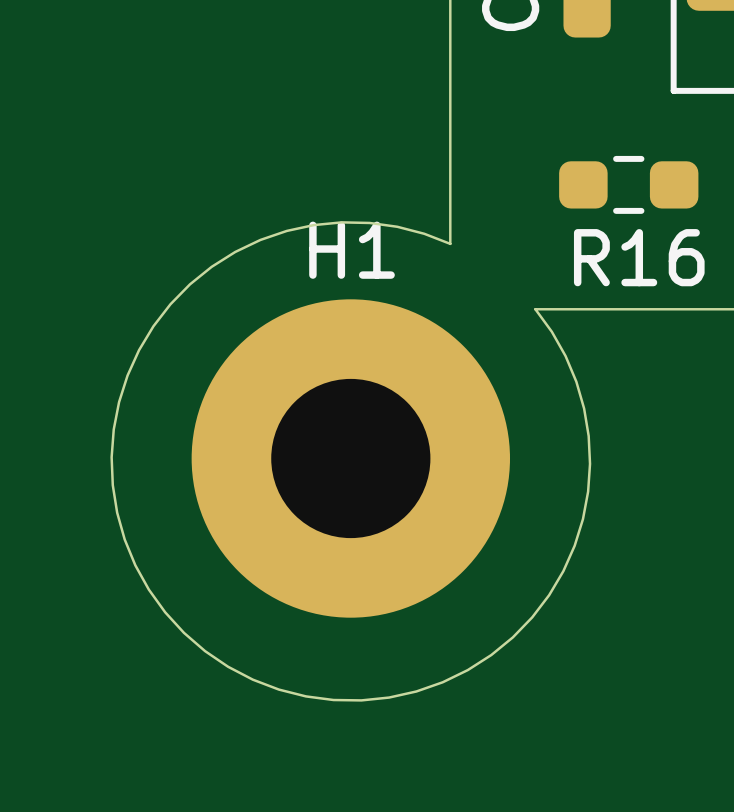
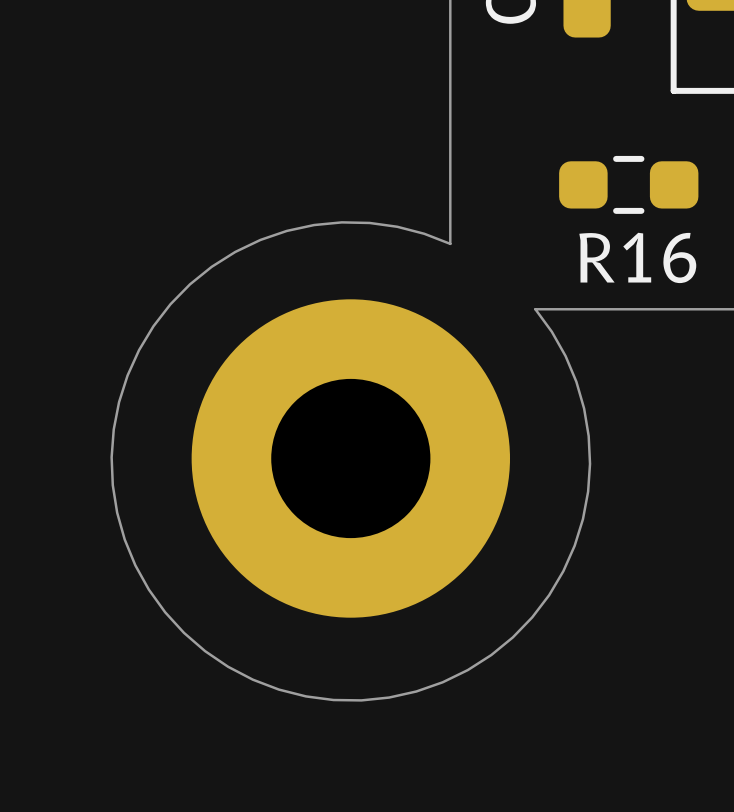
H1 name: H1 (352, 250) -> none

